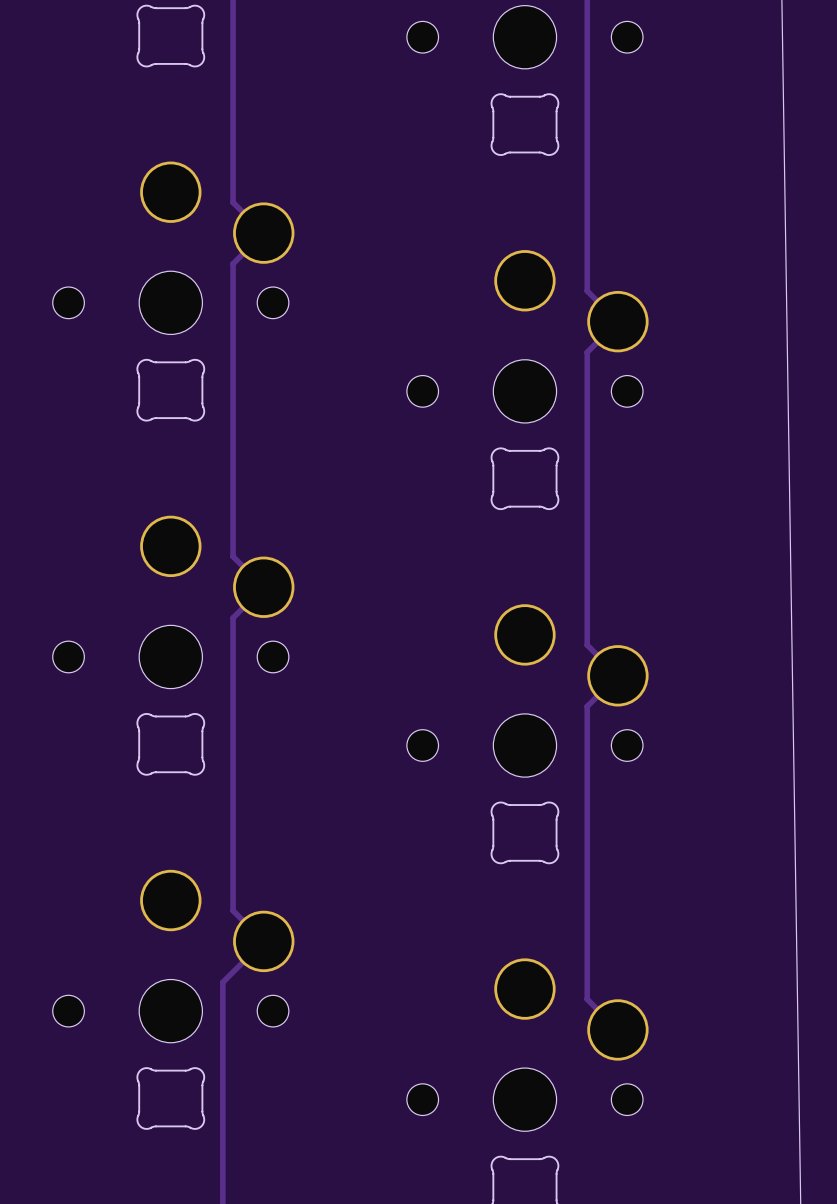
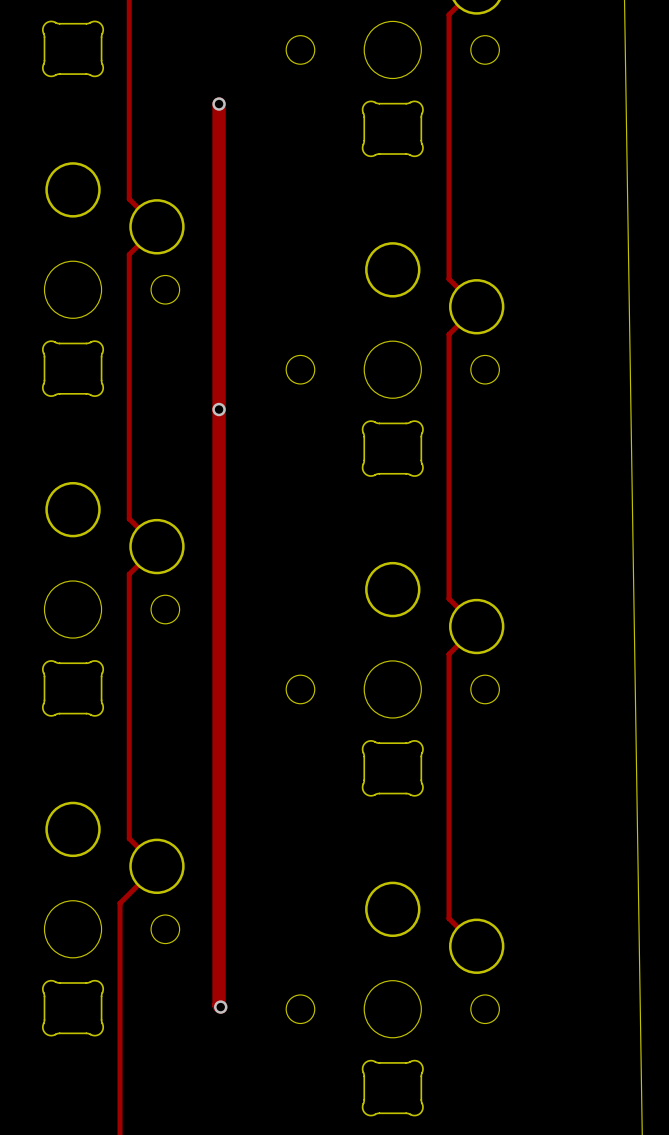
track: none -> (219, 104) (219, 1005) (220, 1007)
via: none -> (219, 104)
via: none -> (219, 409)
via: none -> (220, 1007)

